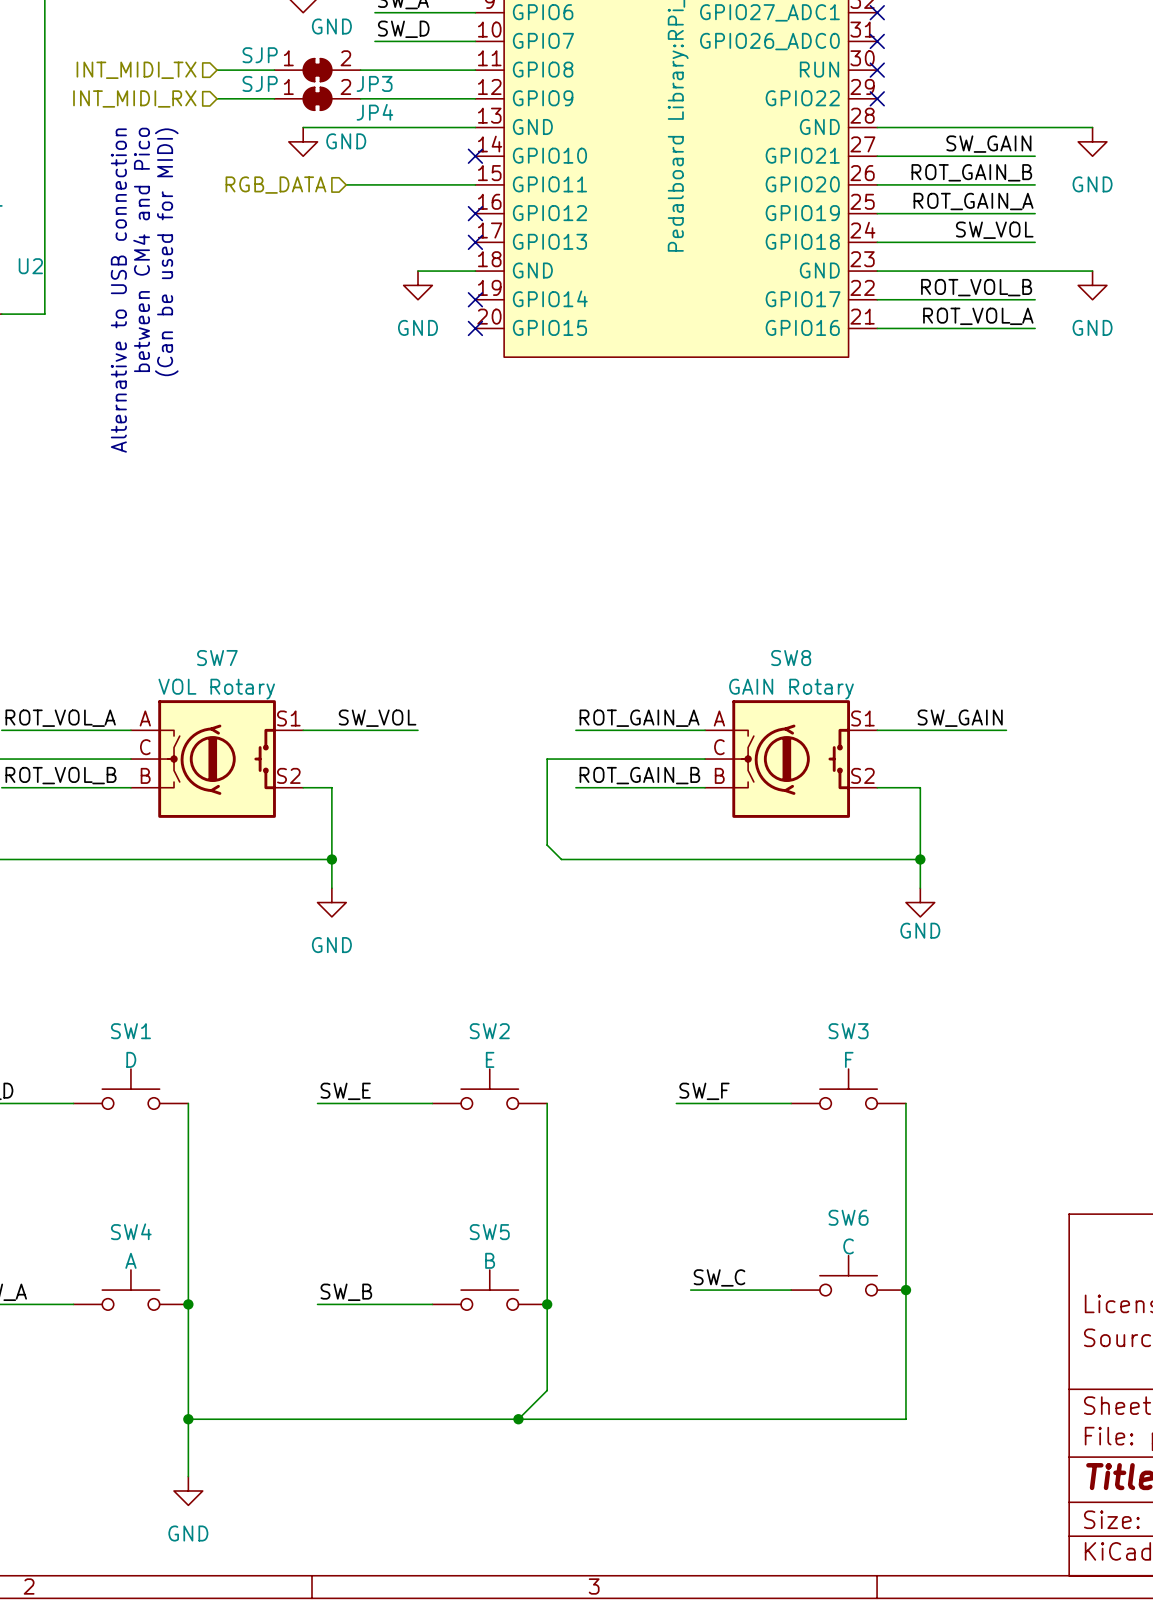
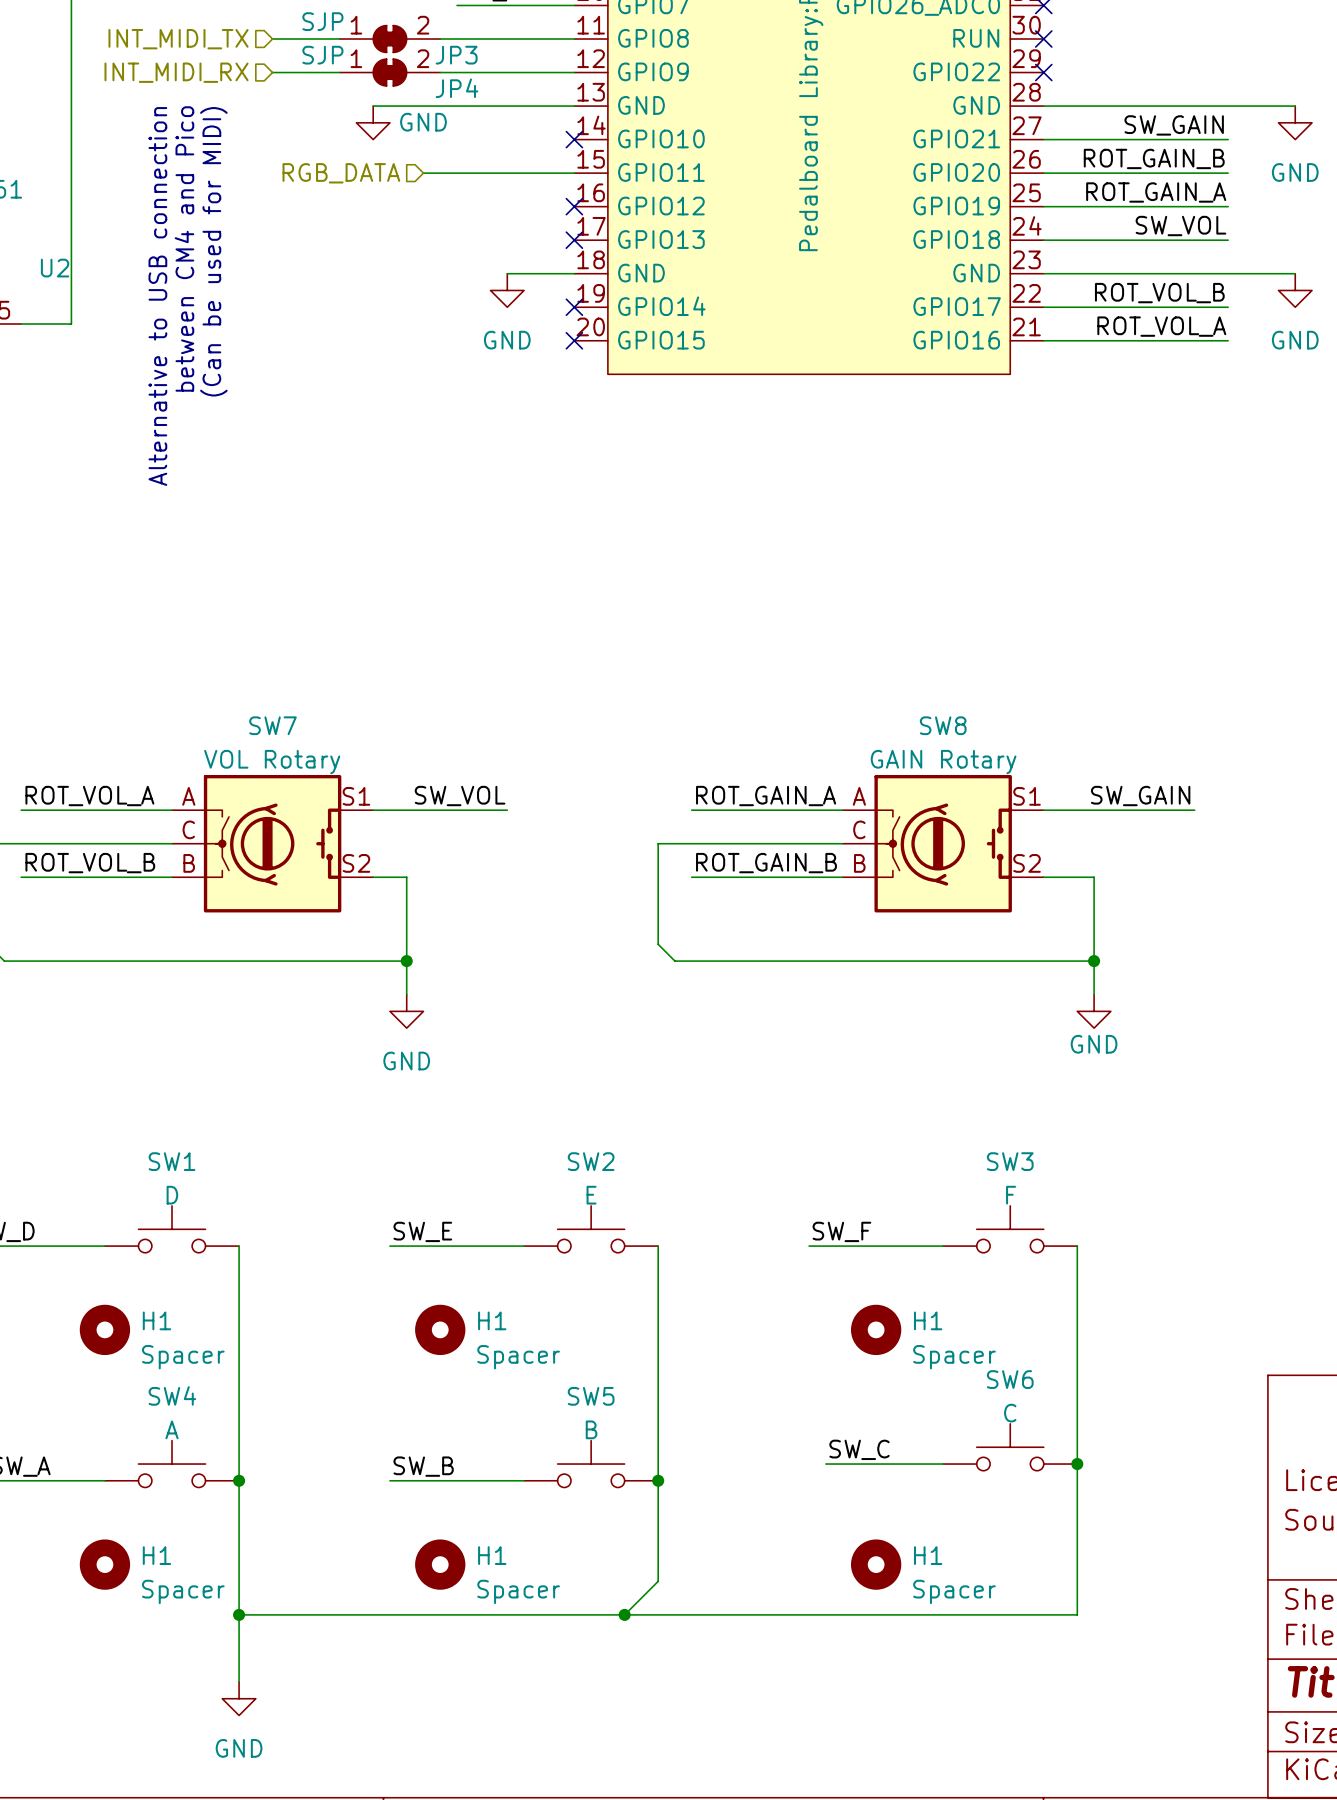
H1: none -> Spacer (104, 1329)
H1: none -> Spacer (440, 1329)
H1: none -> Spacer (876, 1329)
H1: none -> Spacer (104, 1564)
H1: none -> Spacer (440, 1564)
H1: none -> Spacer (876, 1564)

